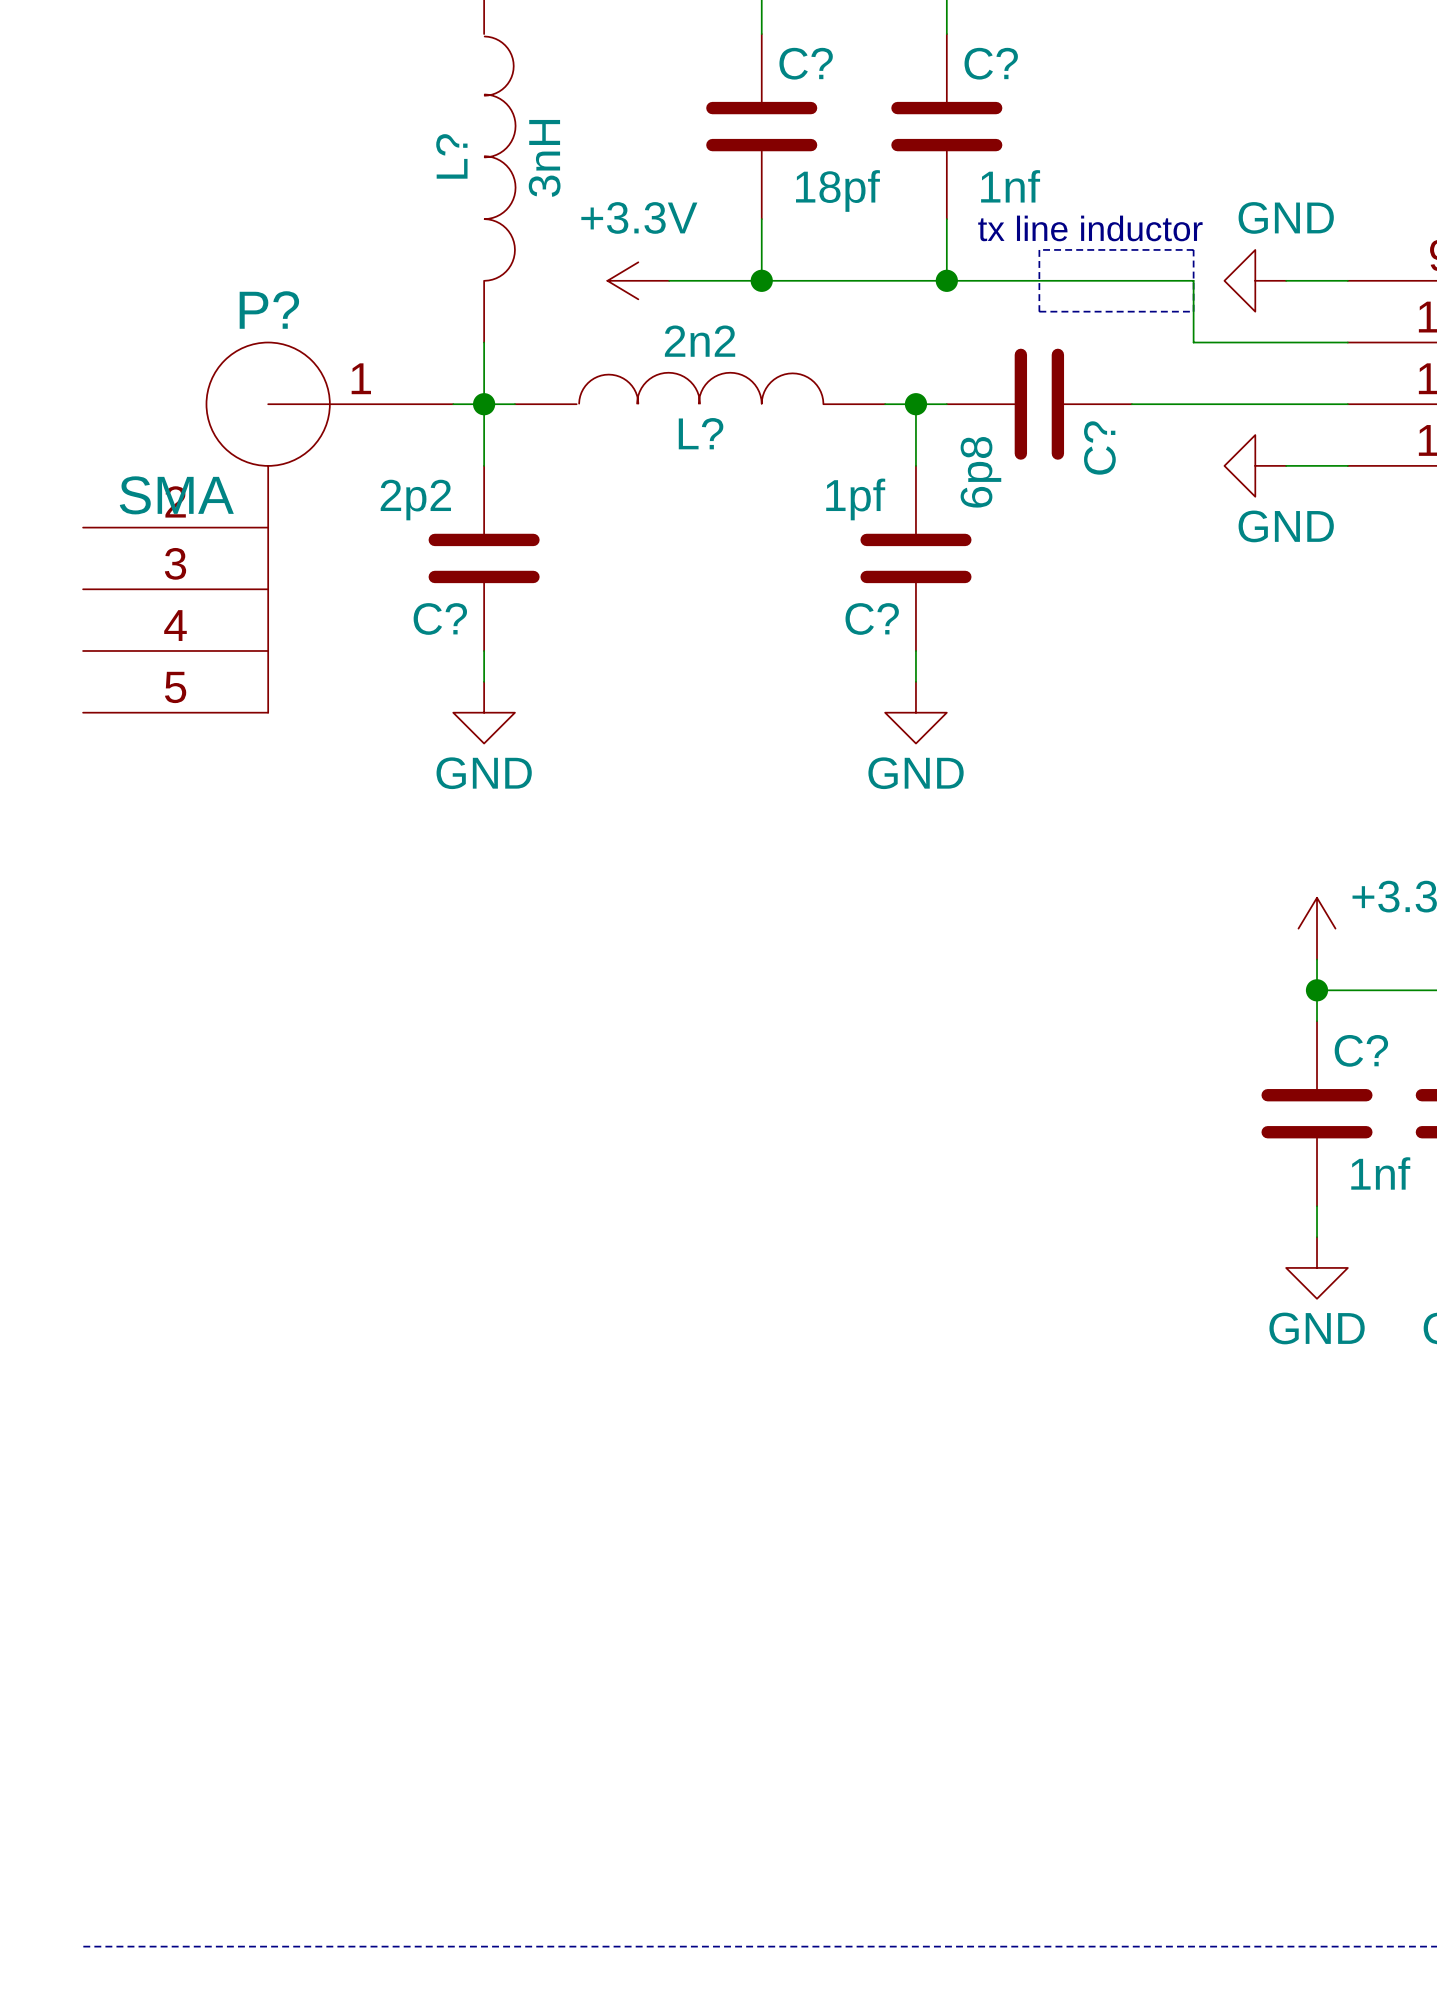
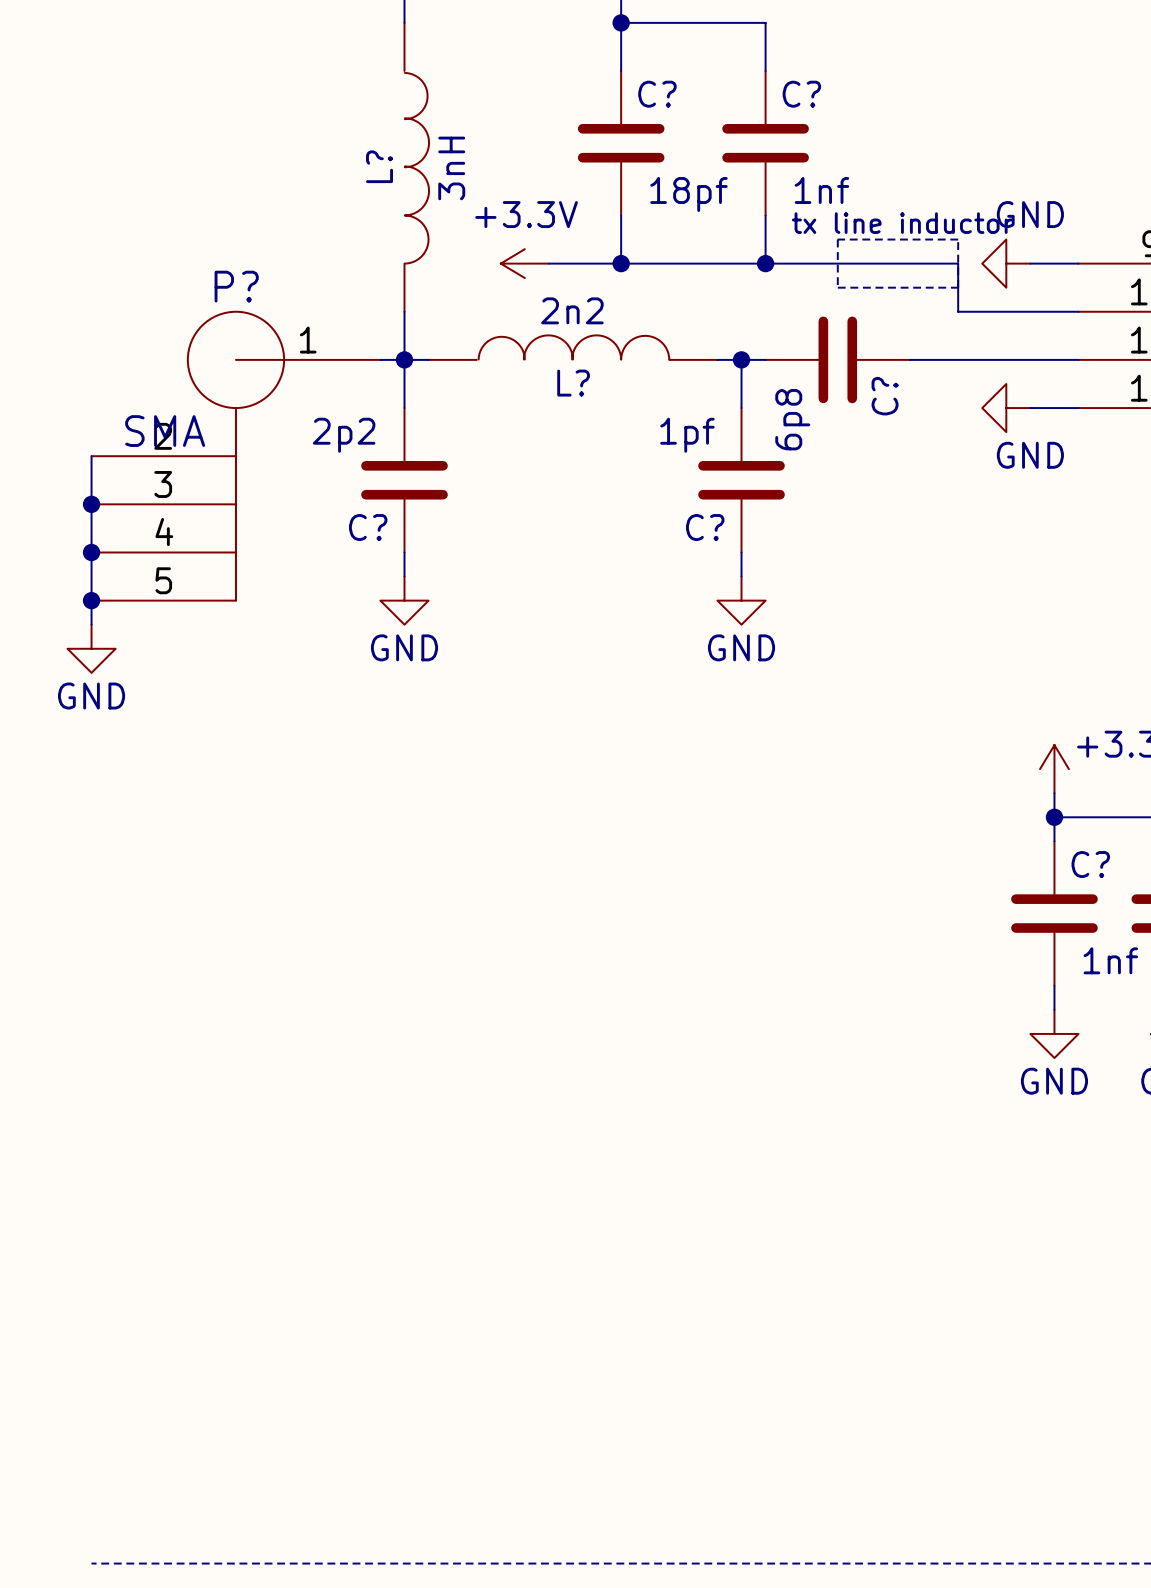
wire: none -> (91, 456) (91, 624)
junction: none -> (91, 504)
junction: none -> (91, 552)
junction: none -> (91, 600)
power symbol: none -> GND (91, 648)

